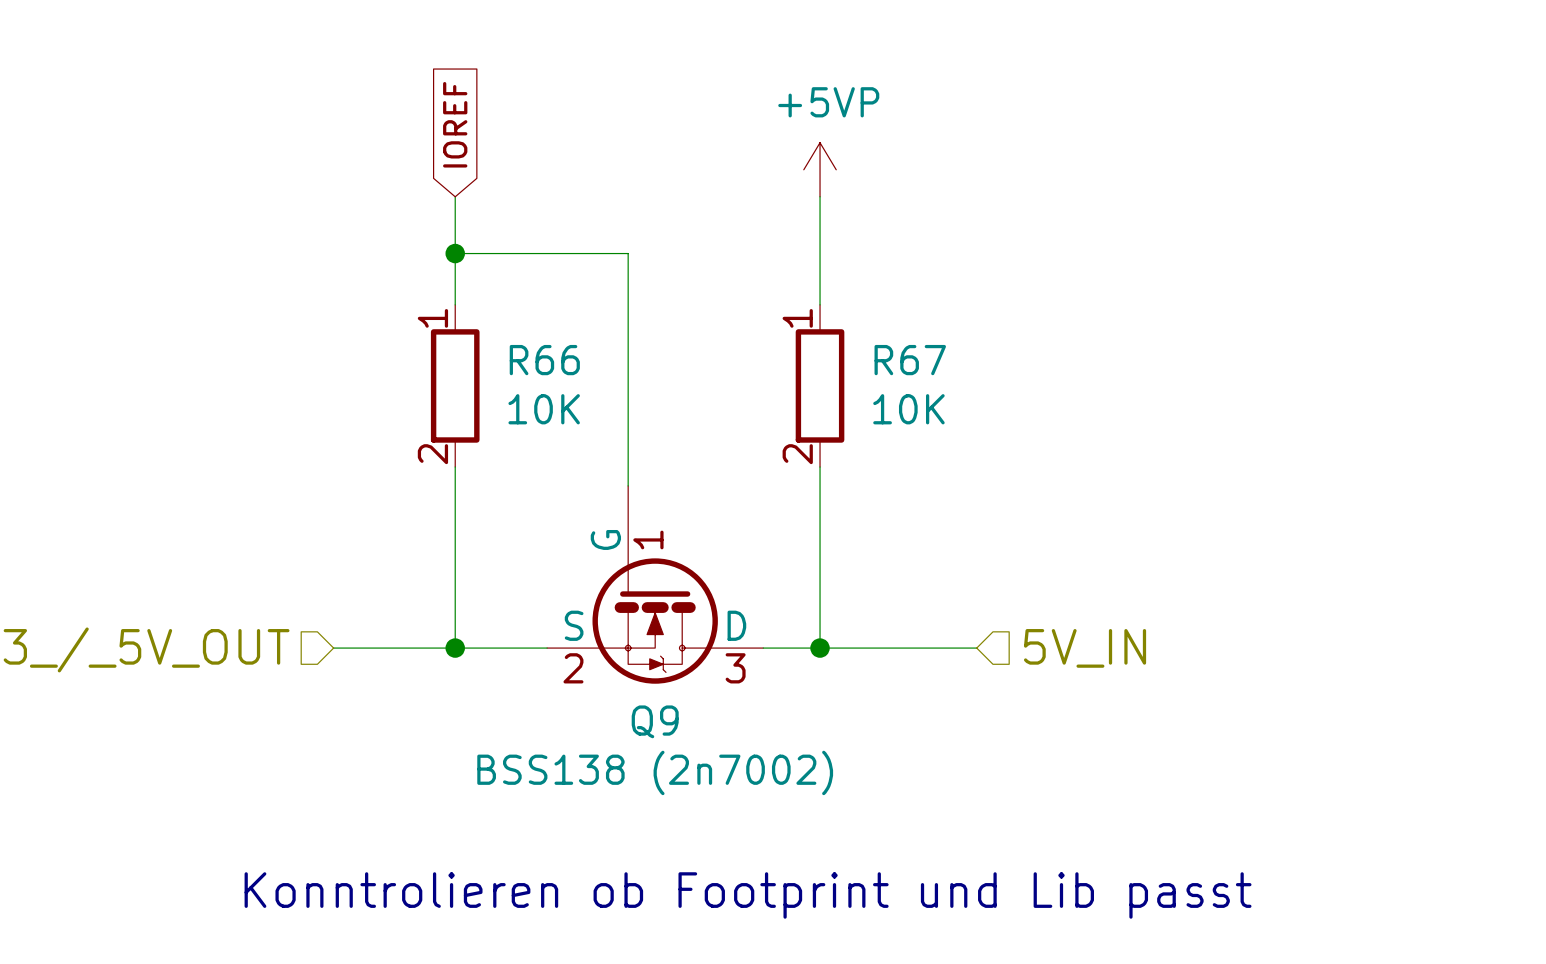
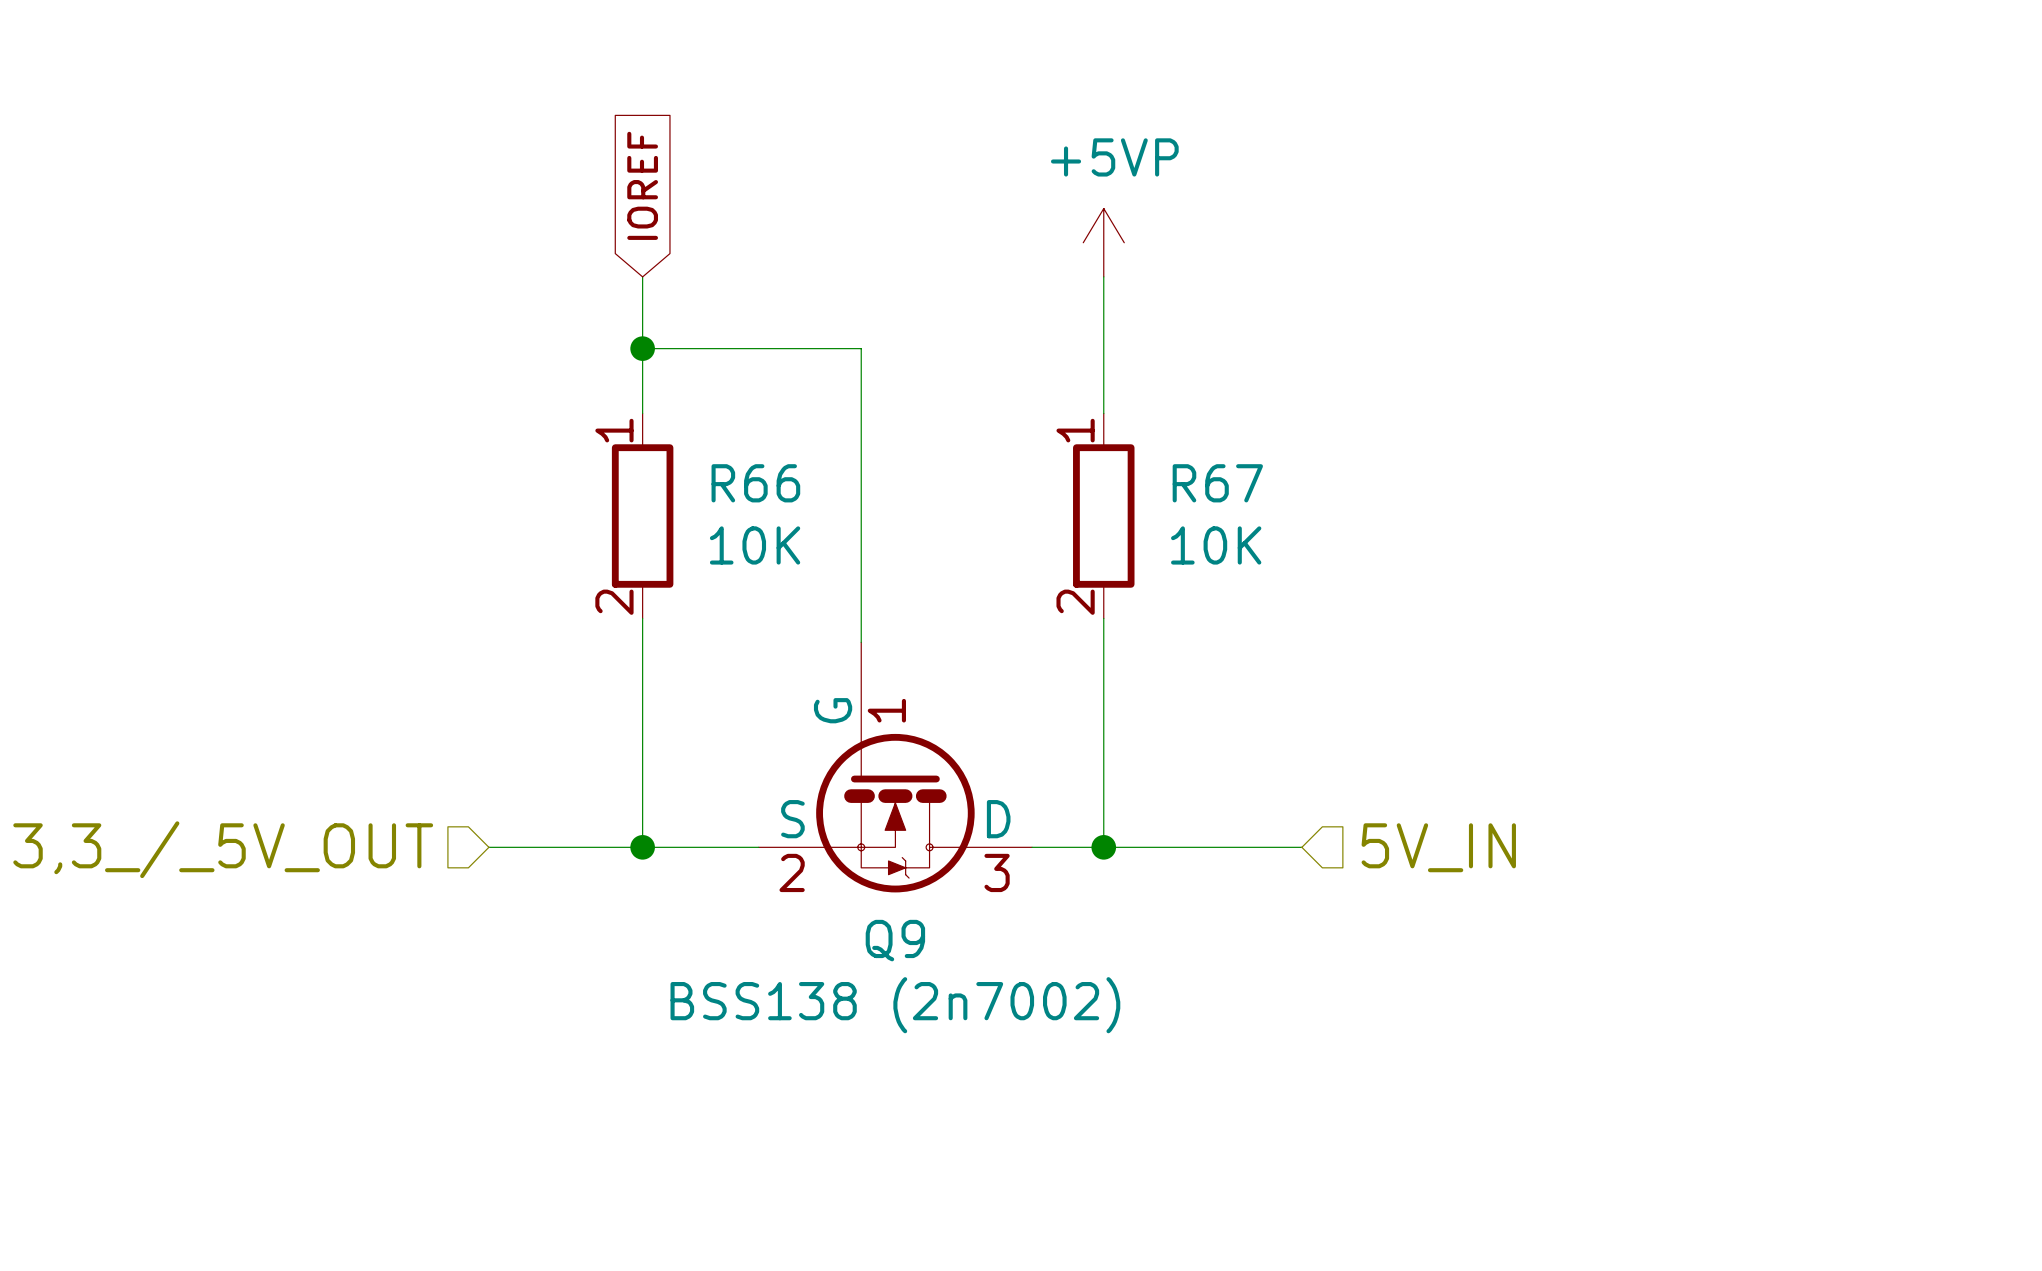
text: Konntrolieren ob Footprint und Lib passt (748, 895) -> none

